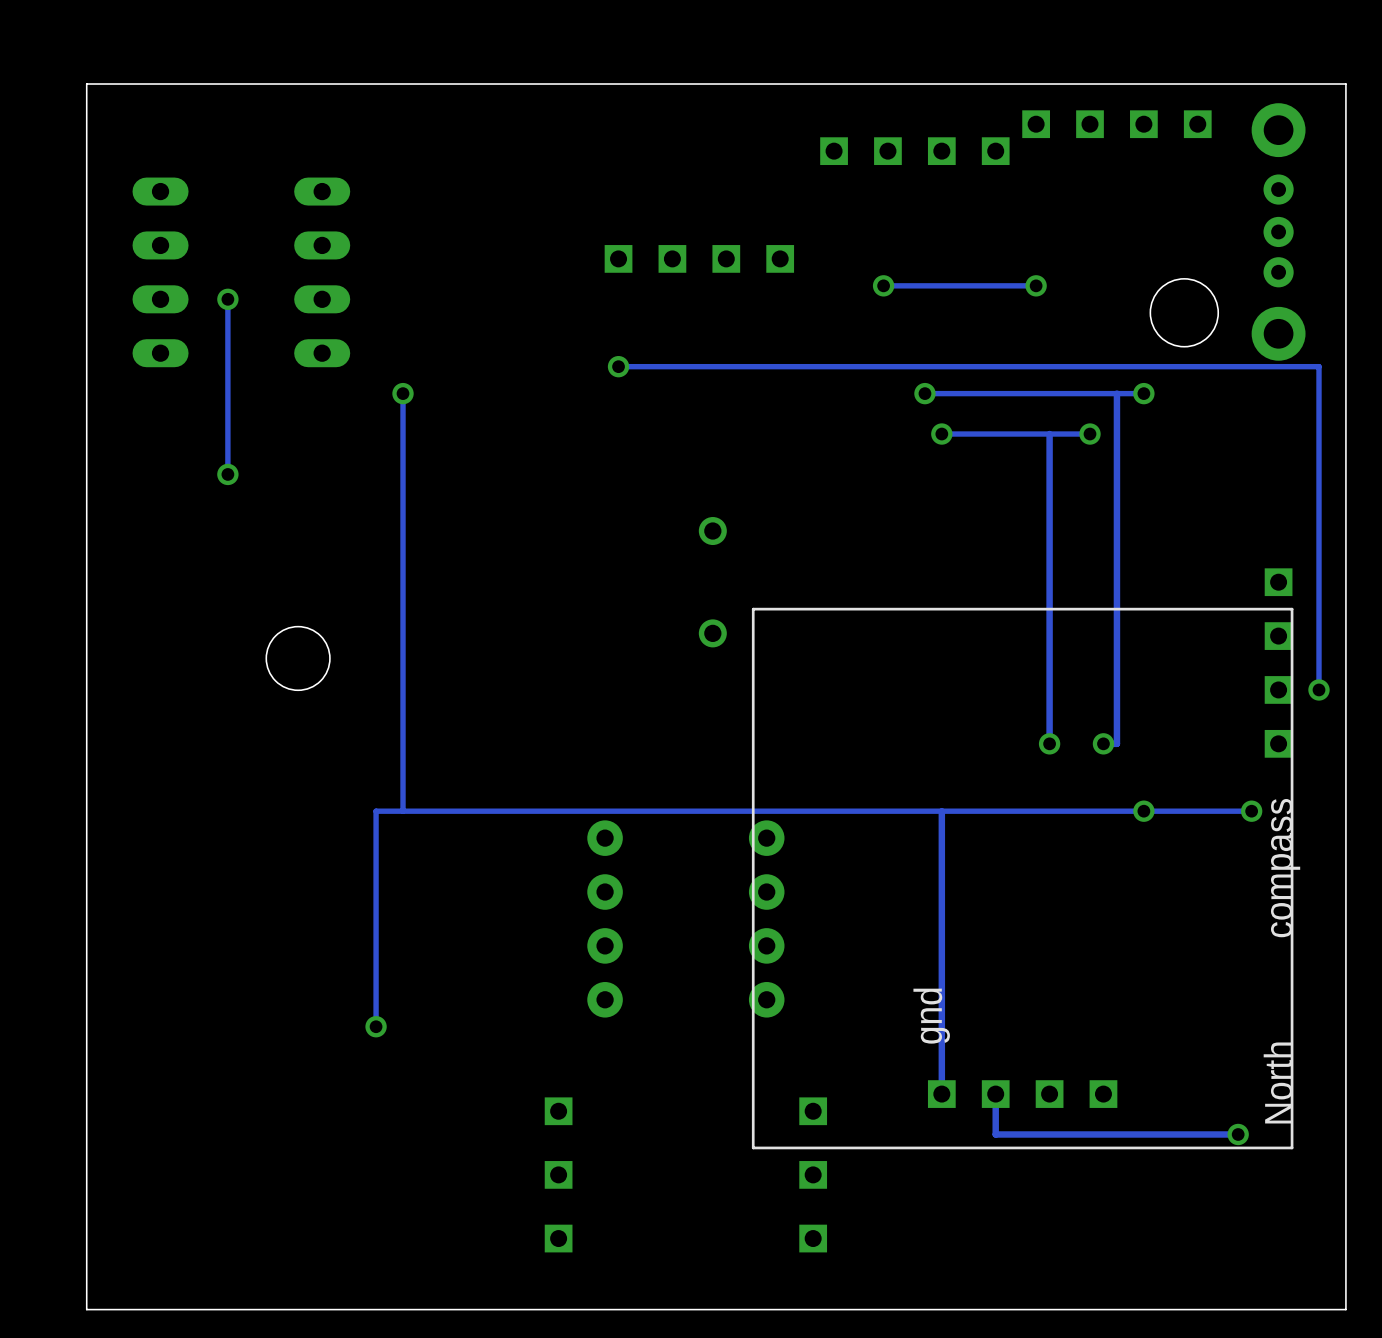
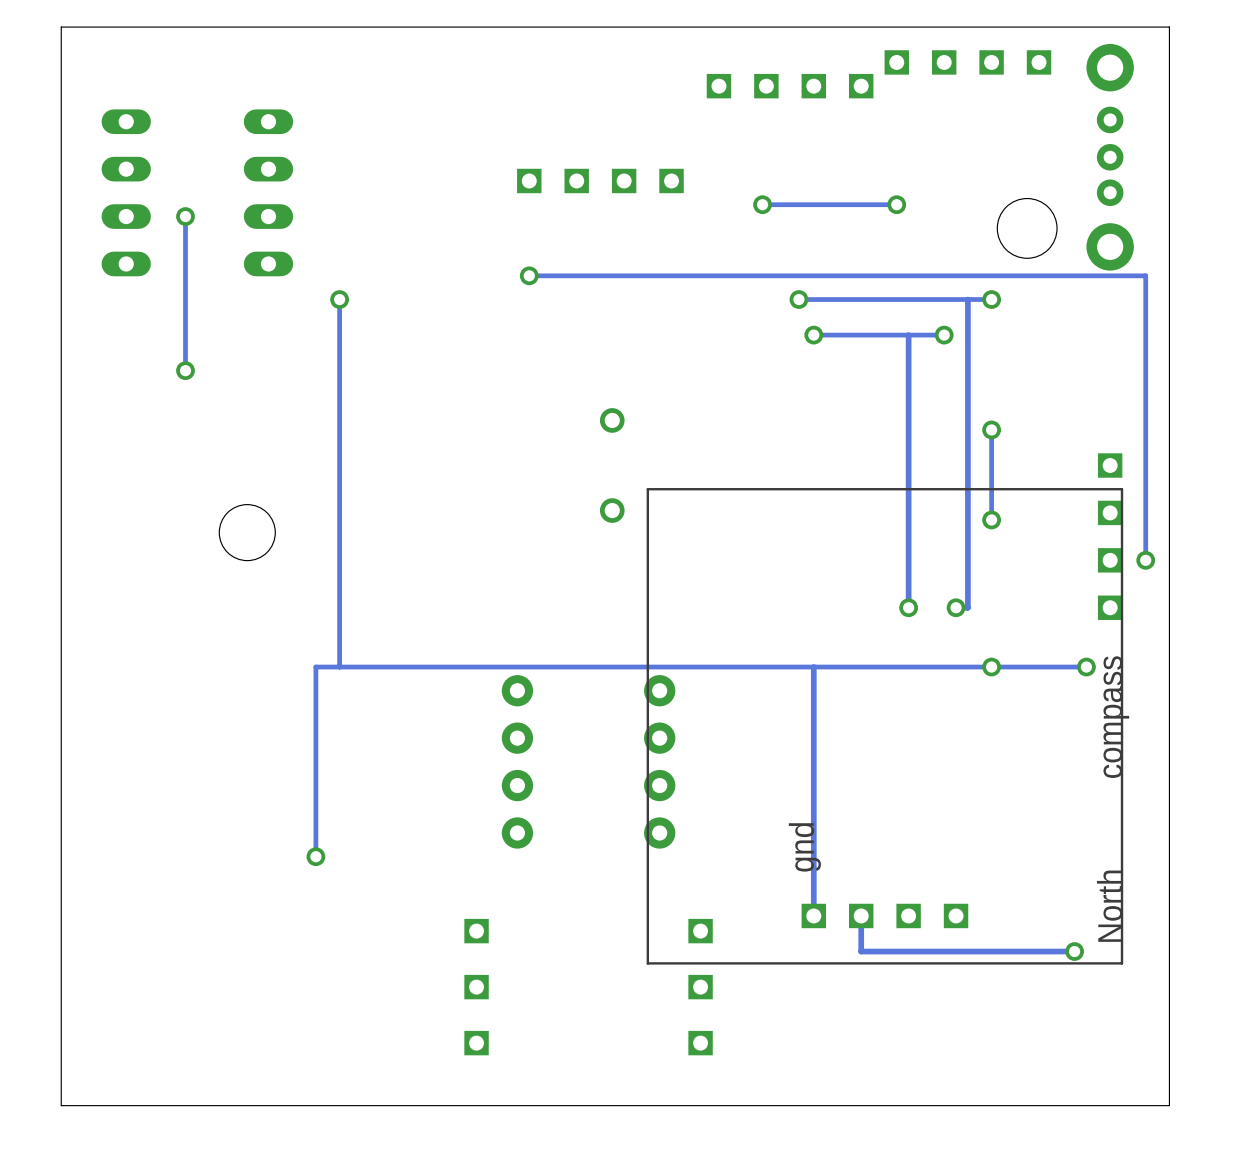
track: none -> (991, 429) (991, 519)
via: none -> (991, 429)
via: none -> (991, 519)

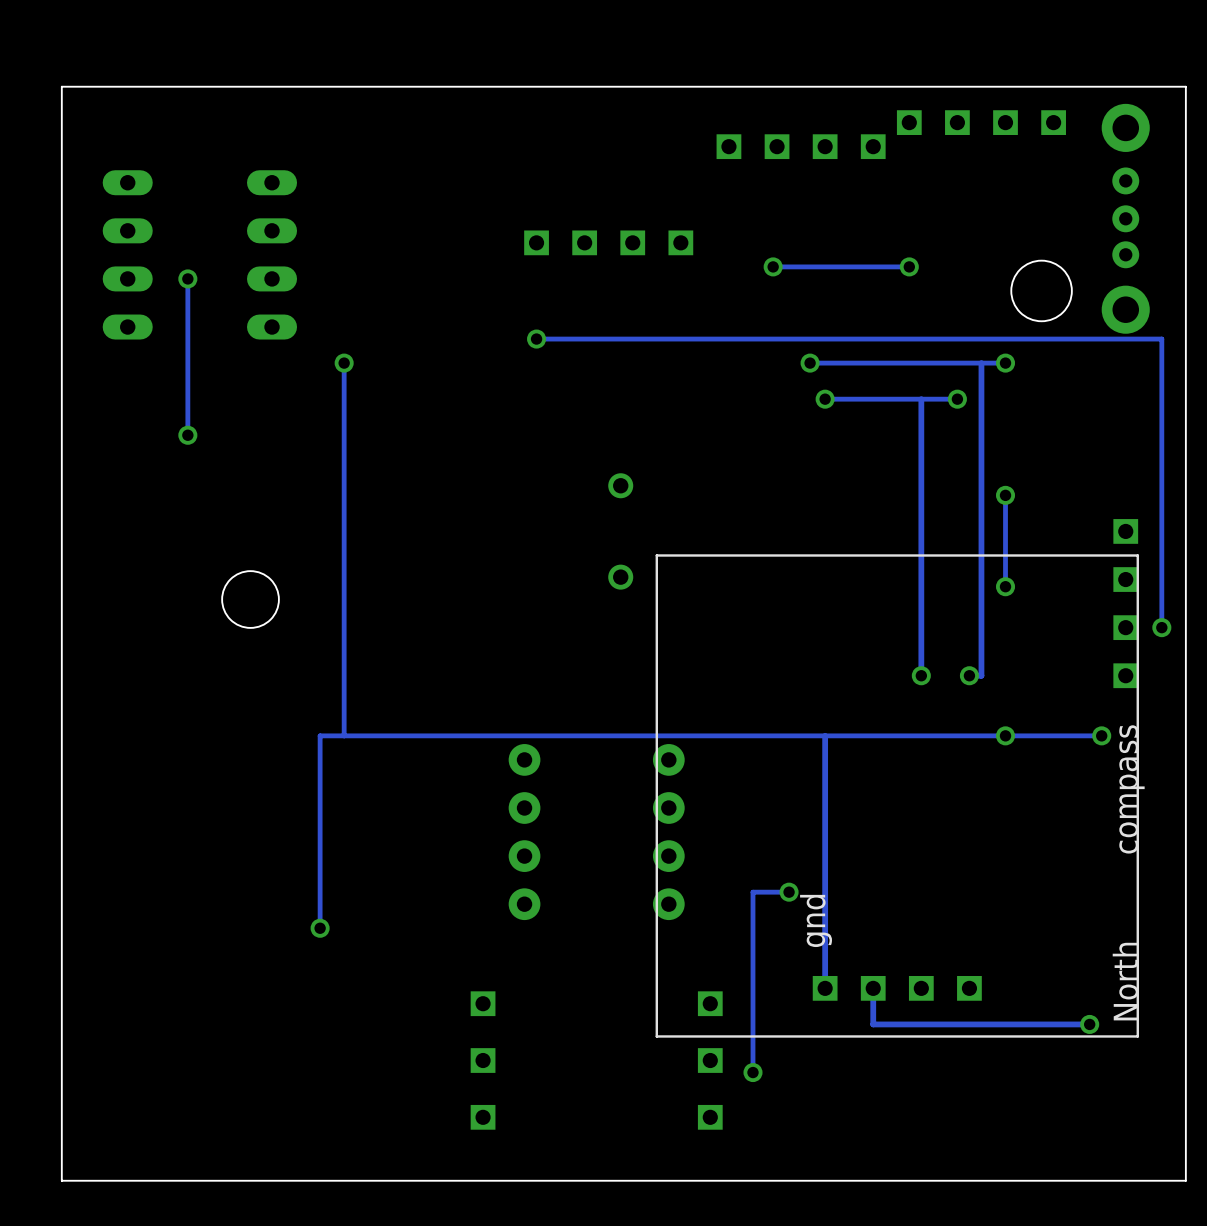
track: none -> (789, 892) (752, 892) (752, 1072)
via: none -> (789, 892)
via: none -> (752, 1072)

